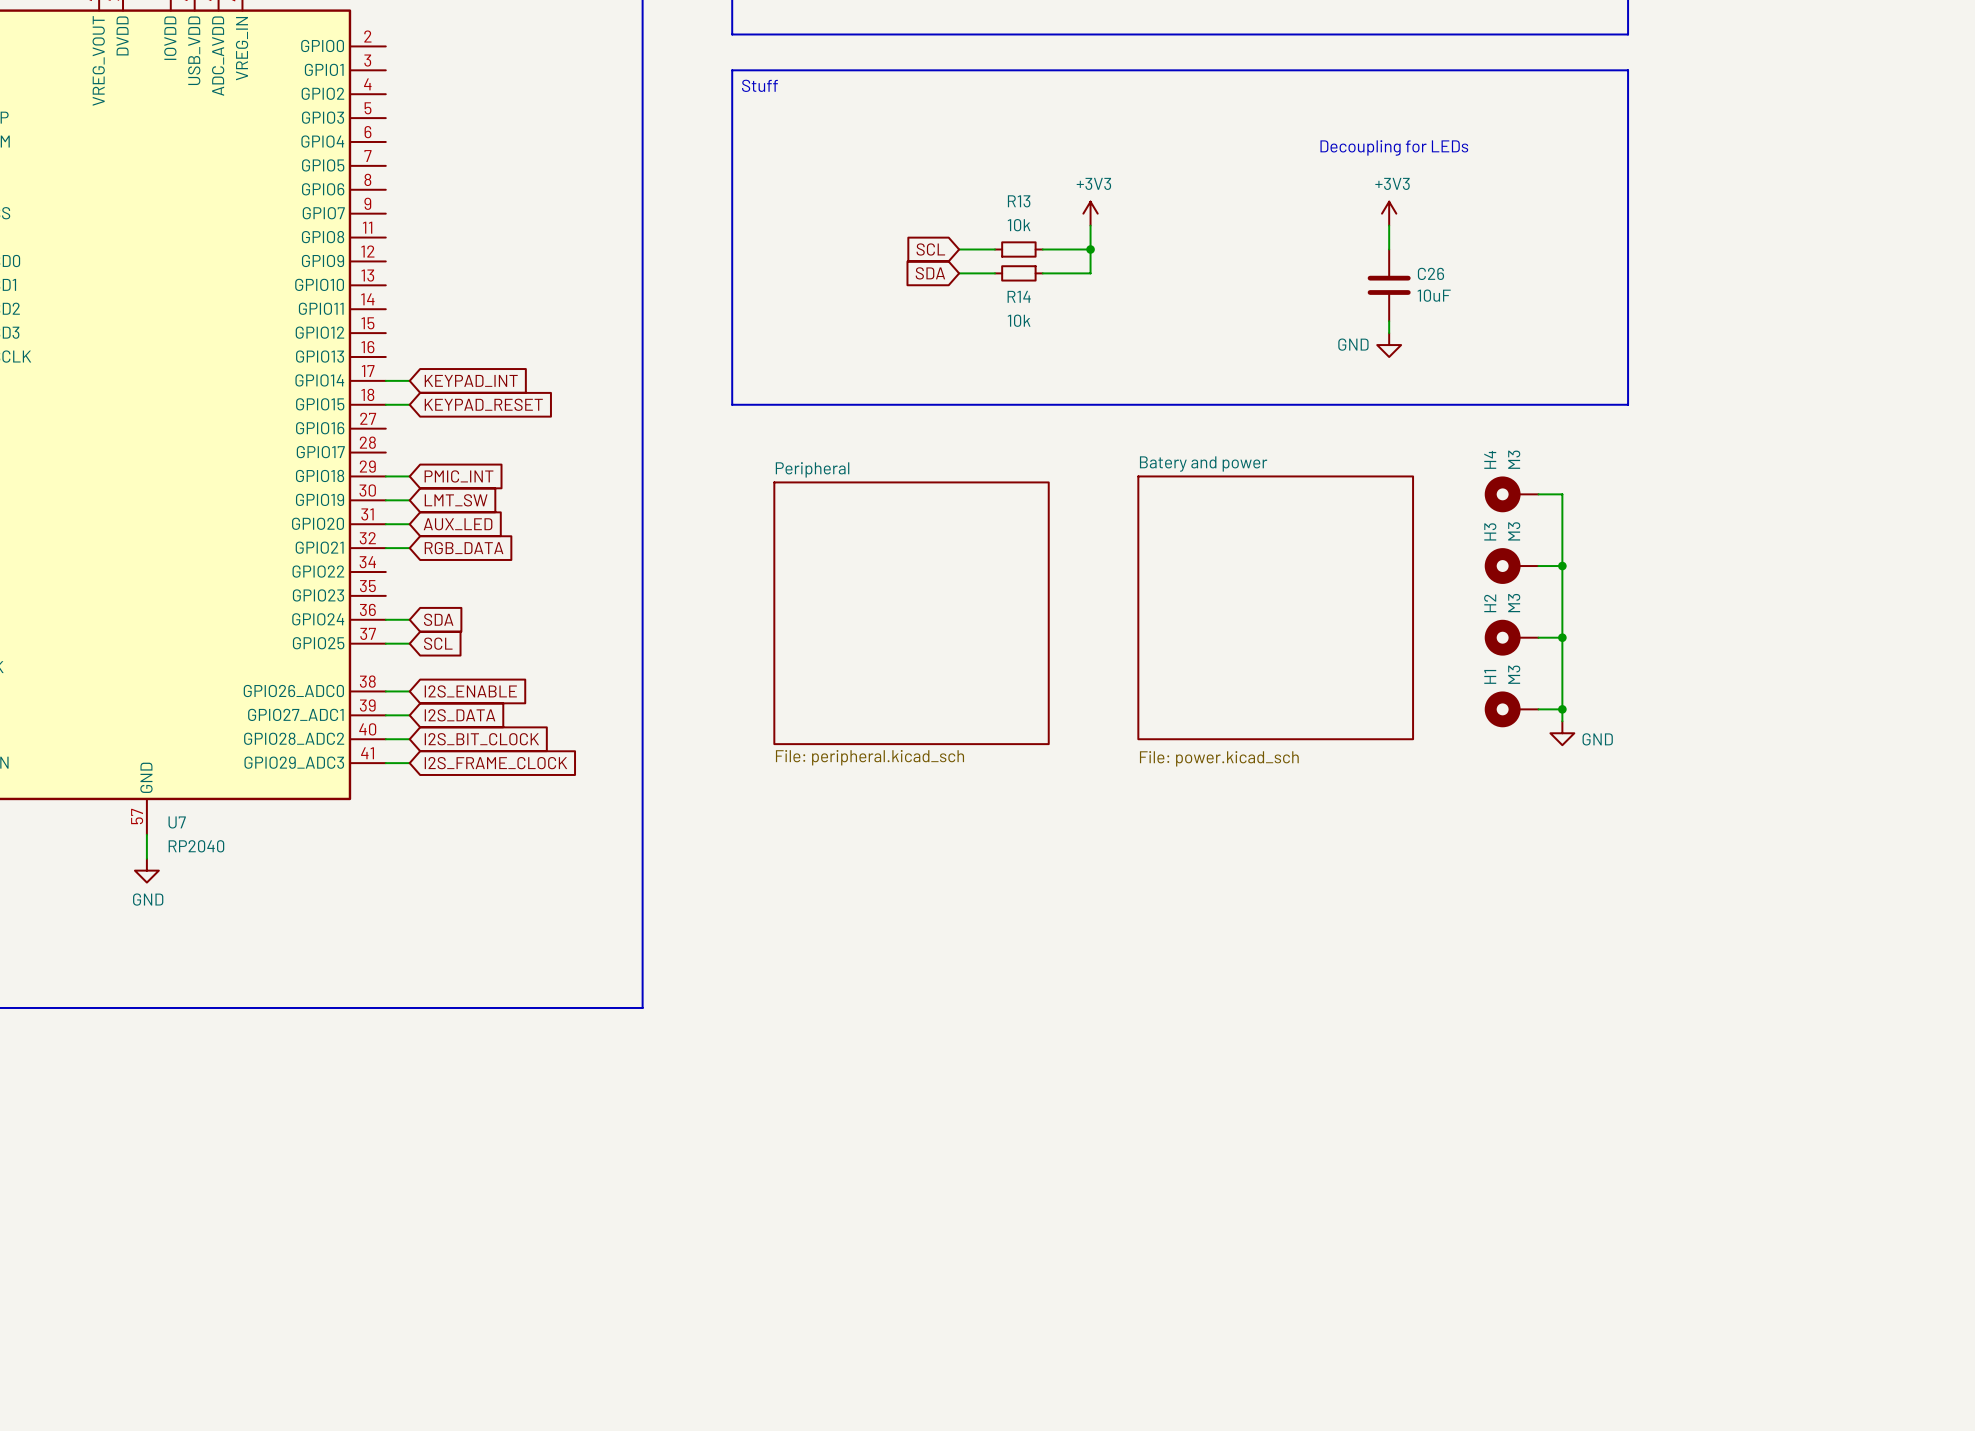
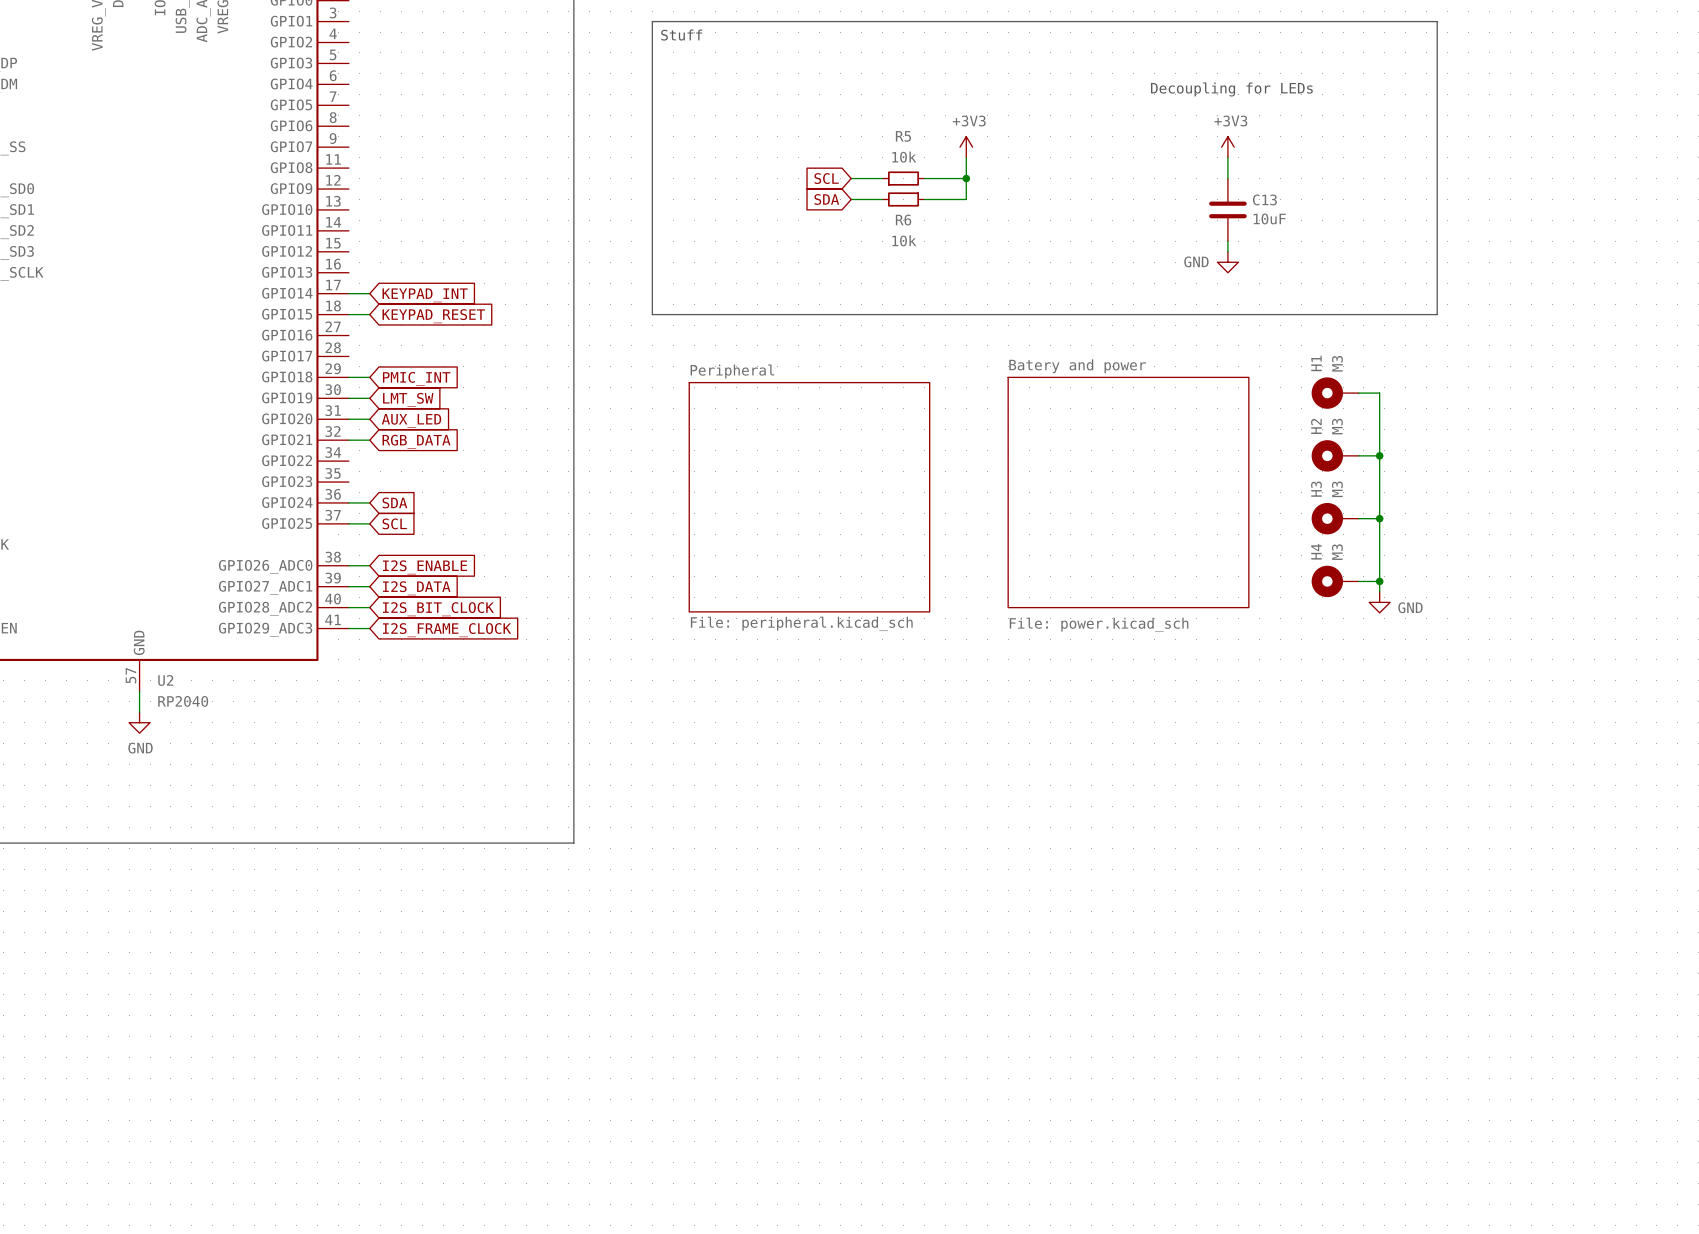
R13 name: R13 (1019, 201) -> R5 (903, 136)
C26 name: C26 (1430, 273) -> C13 (1264, 199)
R14 name: R14 (1019, 296) -> R6 (903, 220)
H4 name: H4 (1490, 459) -> H1 (1316, 363)
H3 name: H3 (1490, 531) -> H2 (1316, 426)
H2 name: H2 (1490, 603) -> H3 (1316, 489)
H1 name: H1 (1490, 676) -> H4 (1316, 551)
U7 name: U7 (177, 822) -> U2 (165, 680)

